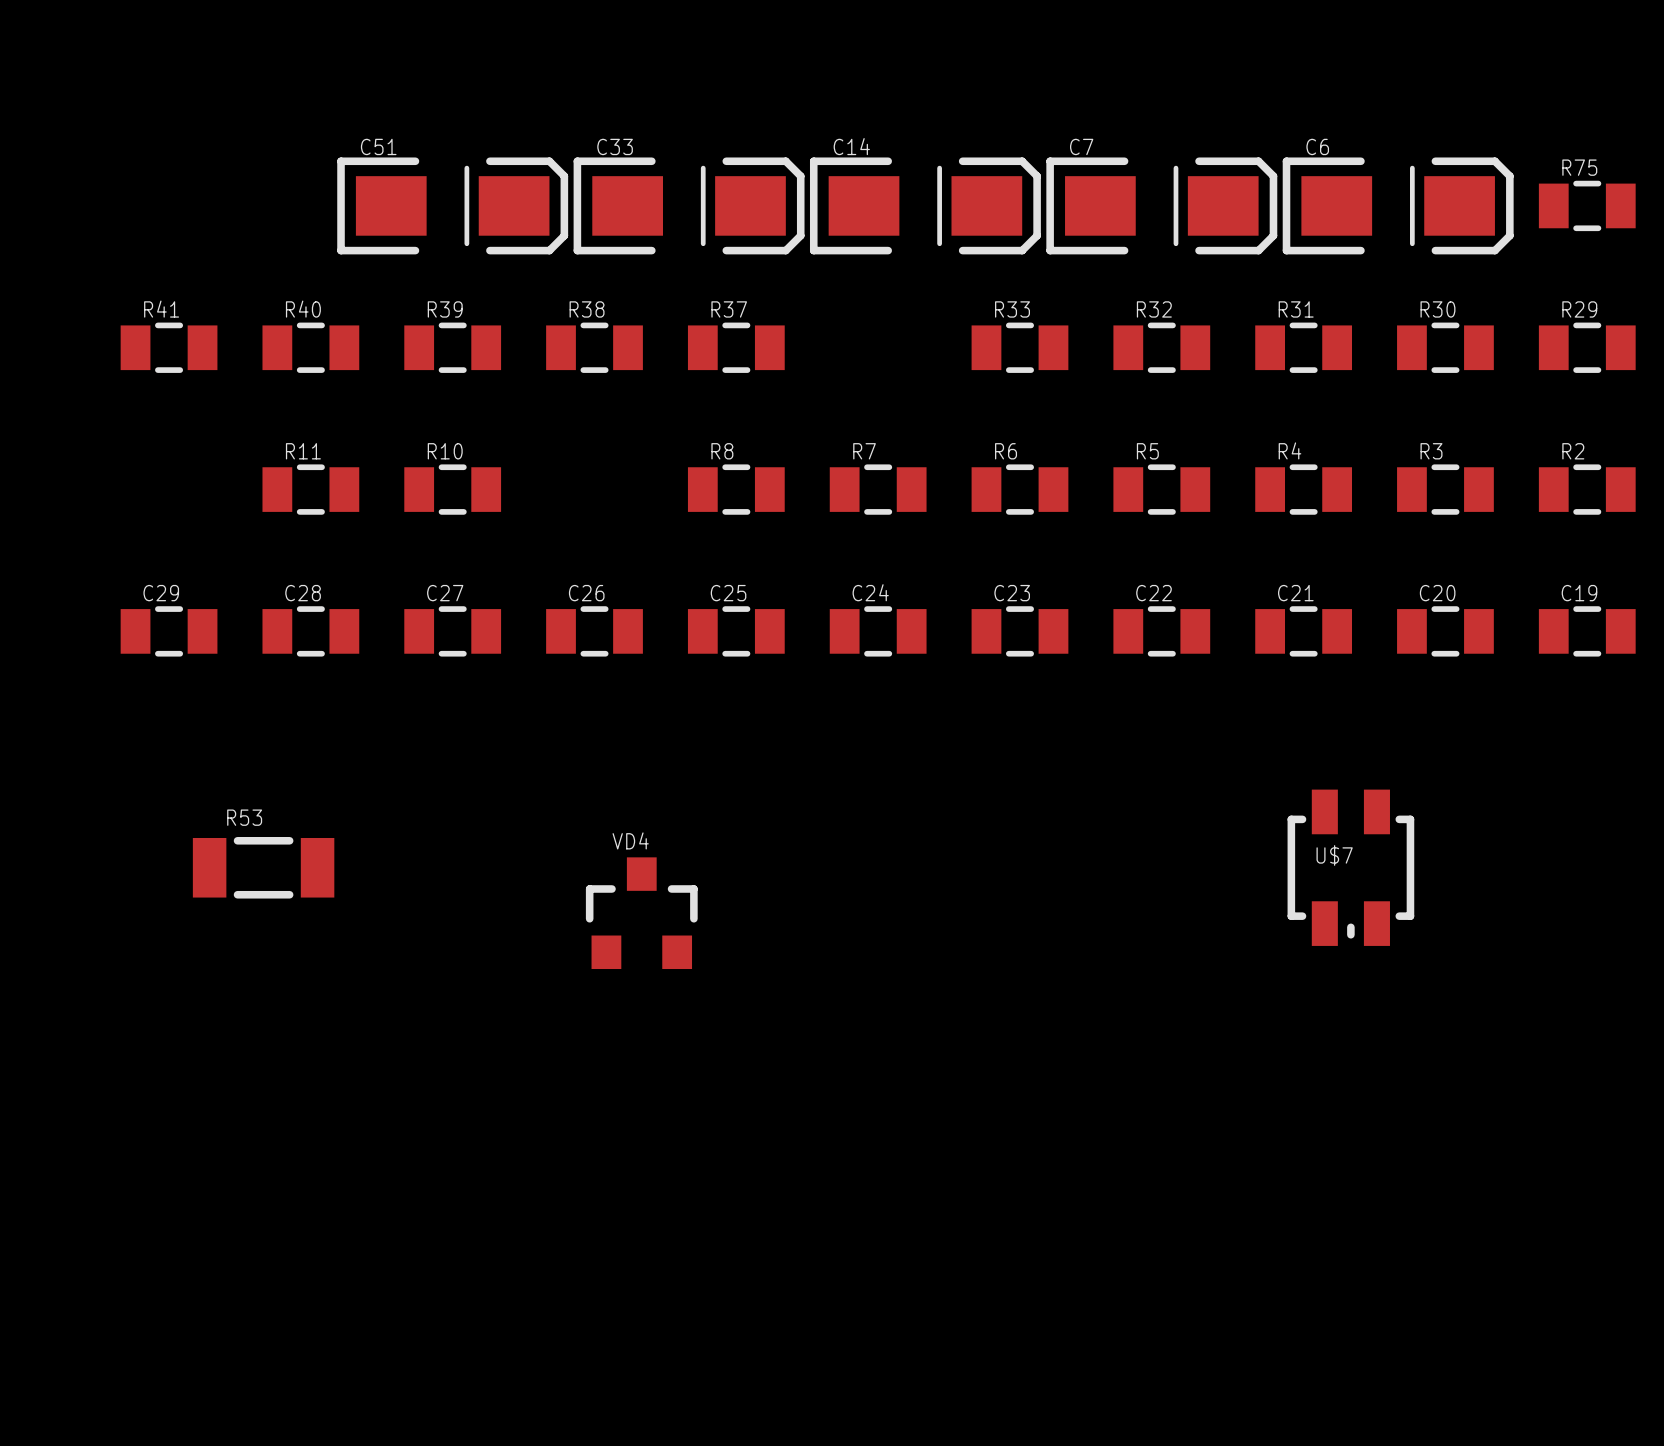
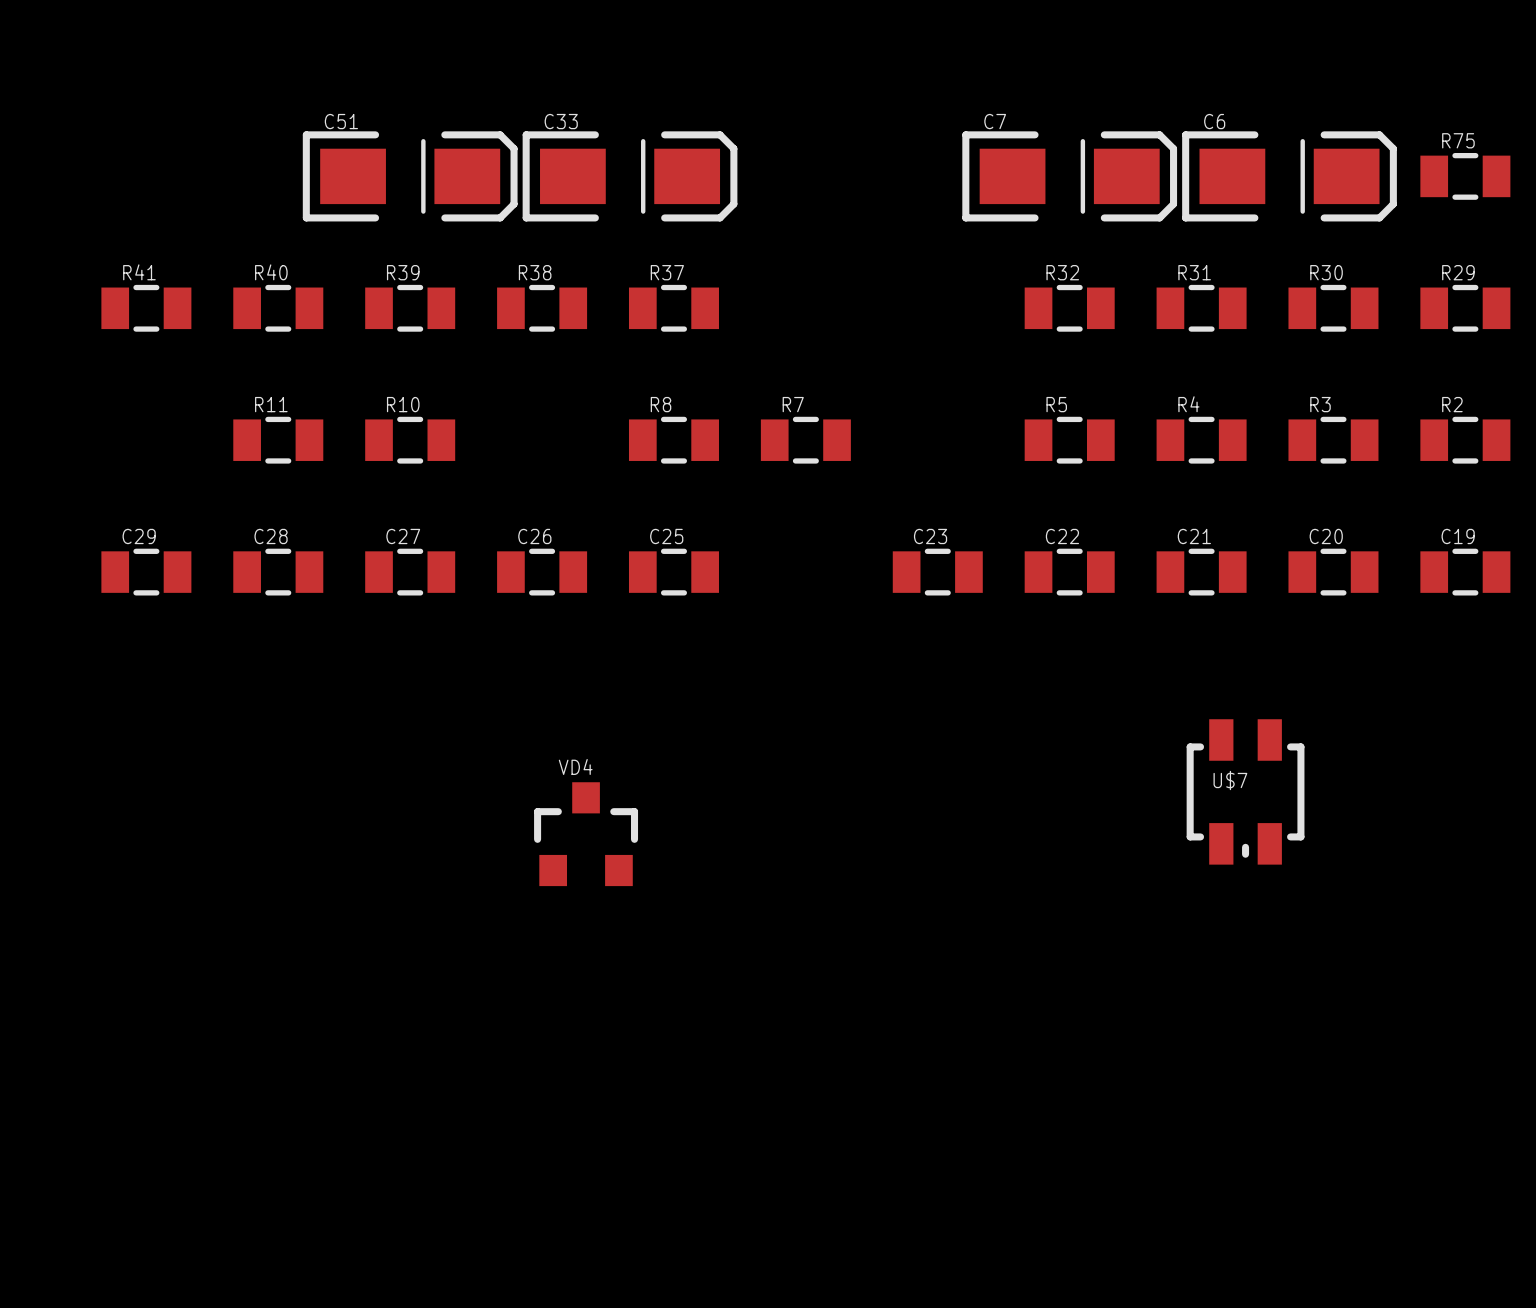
C14: (925, 205) -> none
R33: (1019, 347) -> none
R6: (1019, 489) -> none
C24: (878, 631) -> none
R53: (263, 867) -> none

